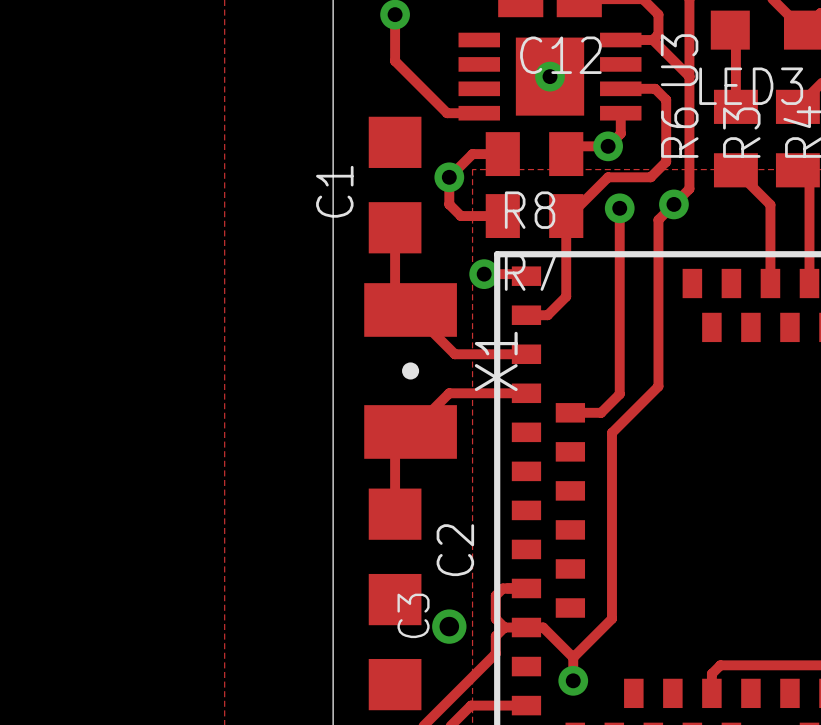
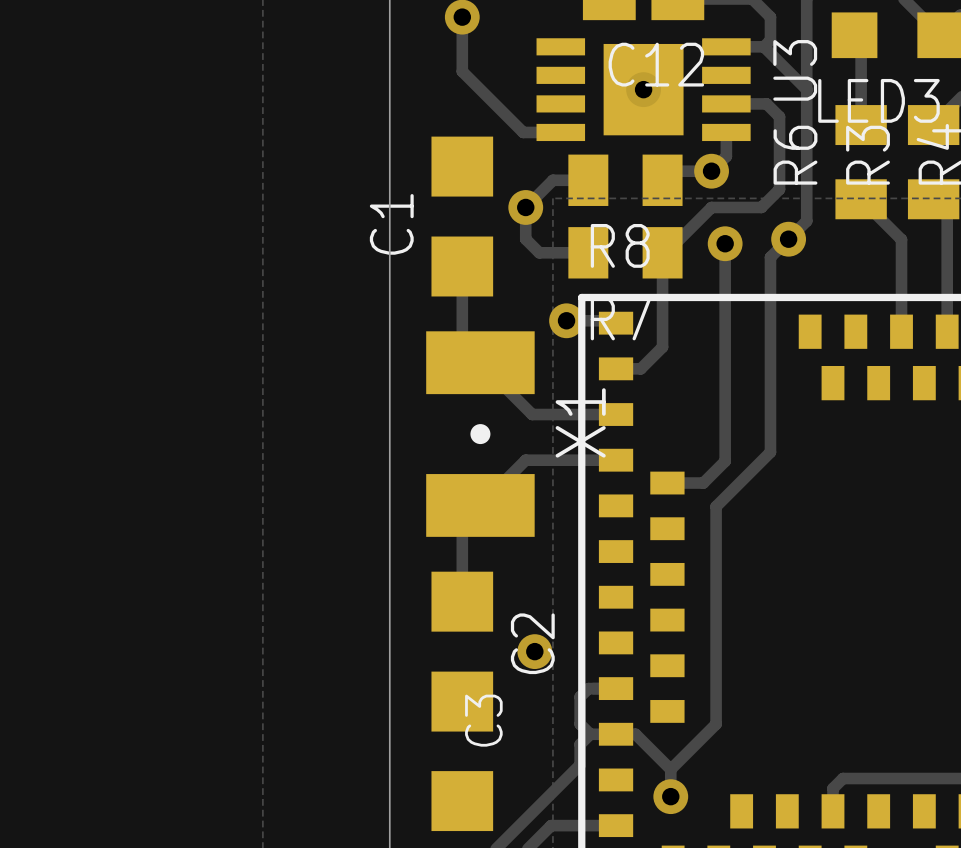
via: none -> (534, 651)
via: (449, 626) -> none

